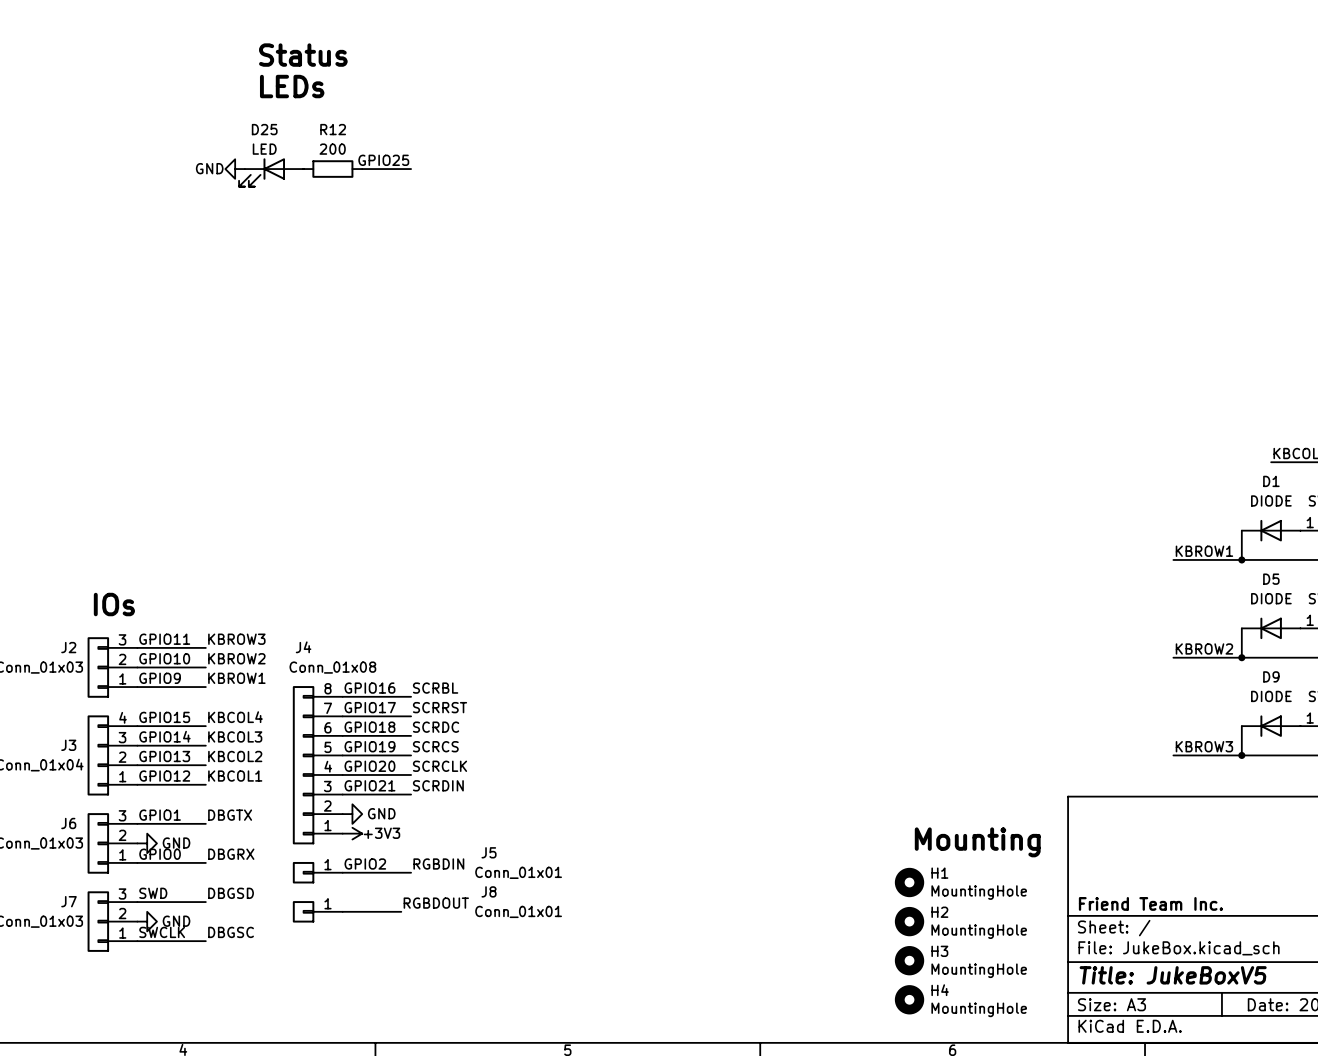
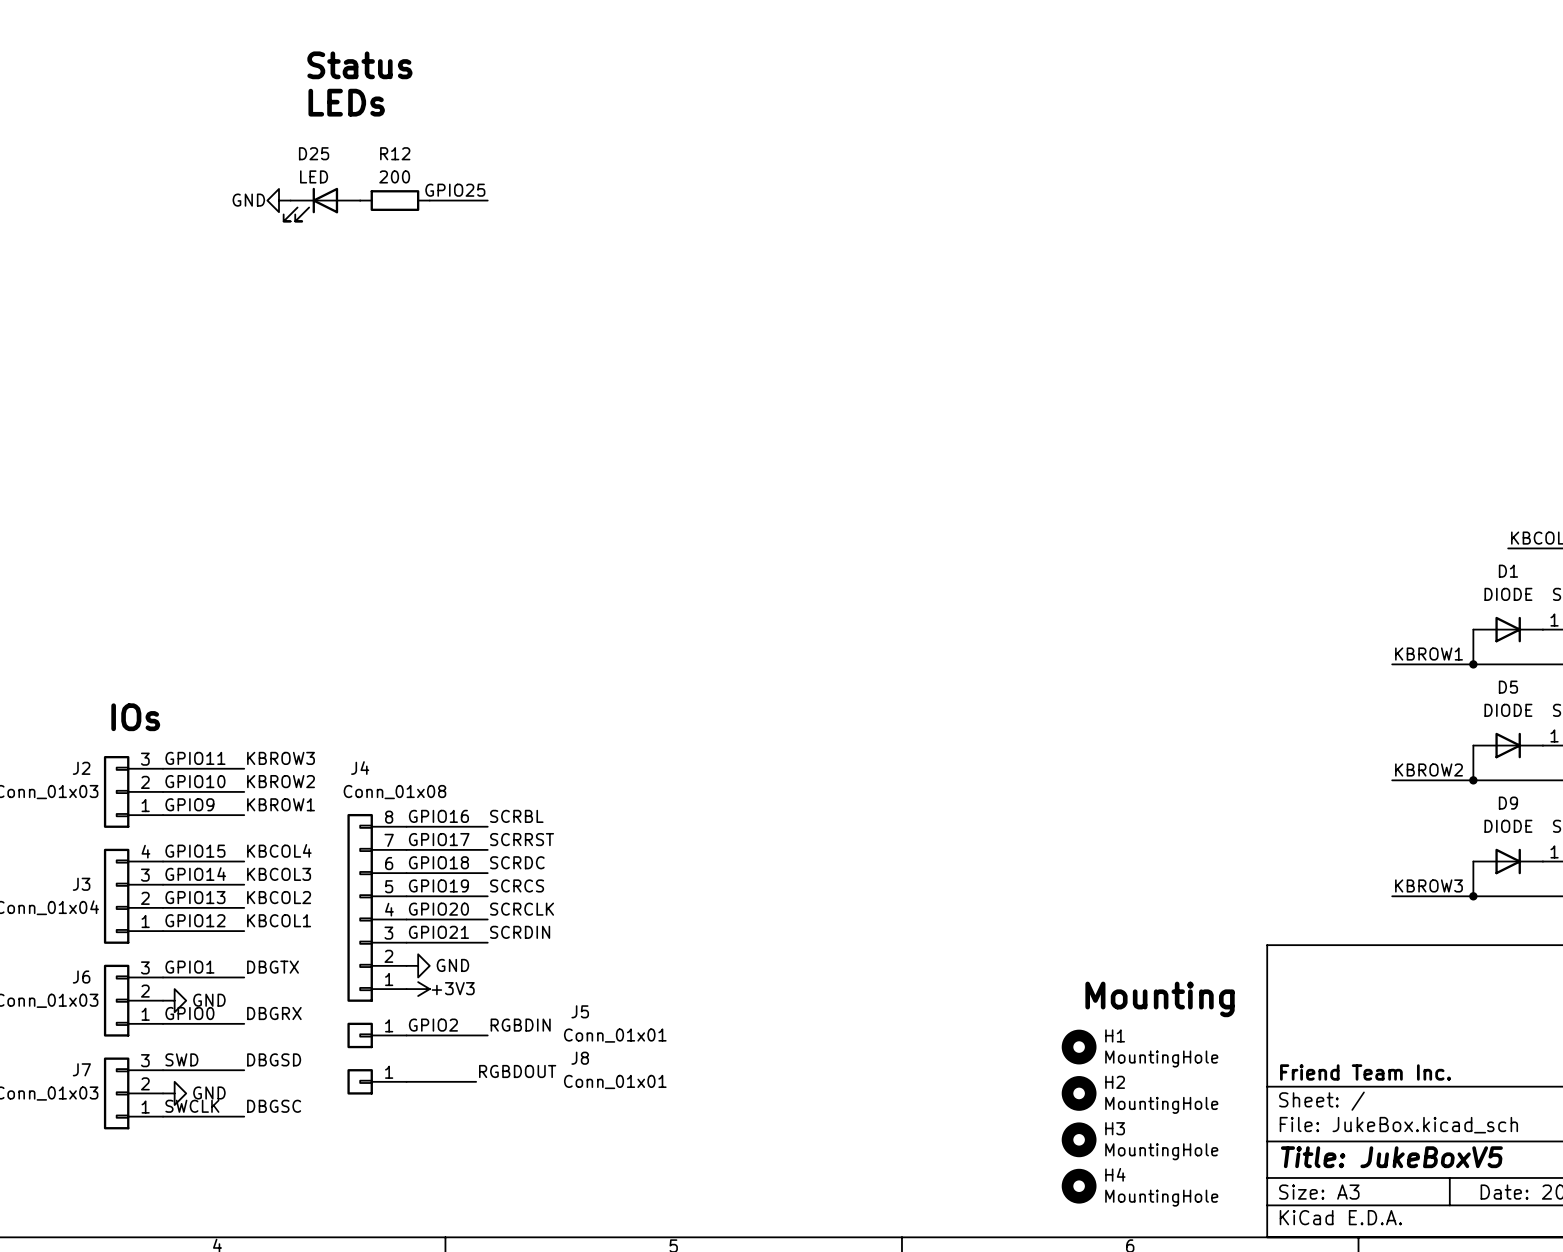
D1 rotation: 0° (1271, 530) -> 180° (1508, 629)
D5 rotation: 0° (1271, 628) -> 180° (1508, 745)
D9 rotation: 0° (1271, 726) -> 180° (1508, 861)

